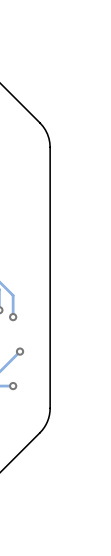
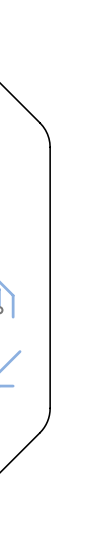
via: (13, 317) -> none
via: (20, 351) -> none
via: (13, 386) -> none

